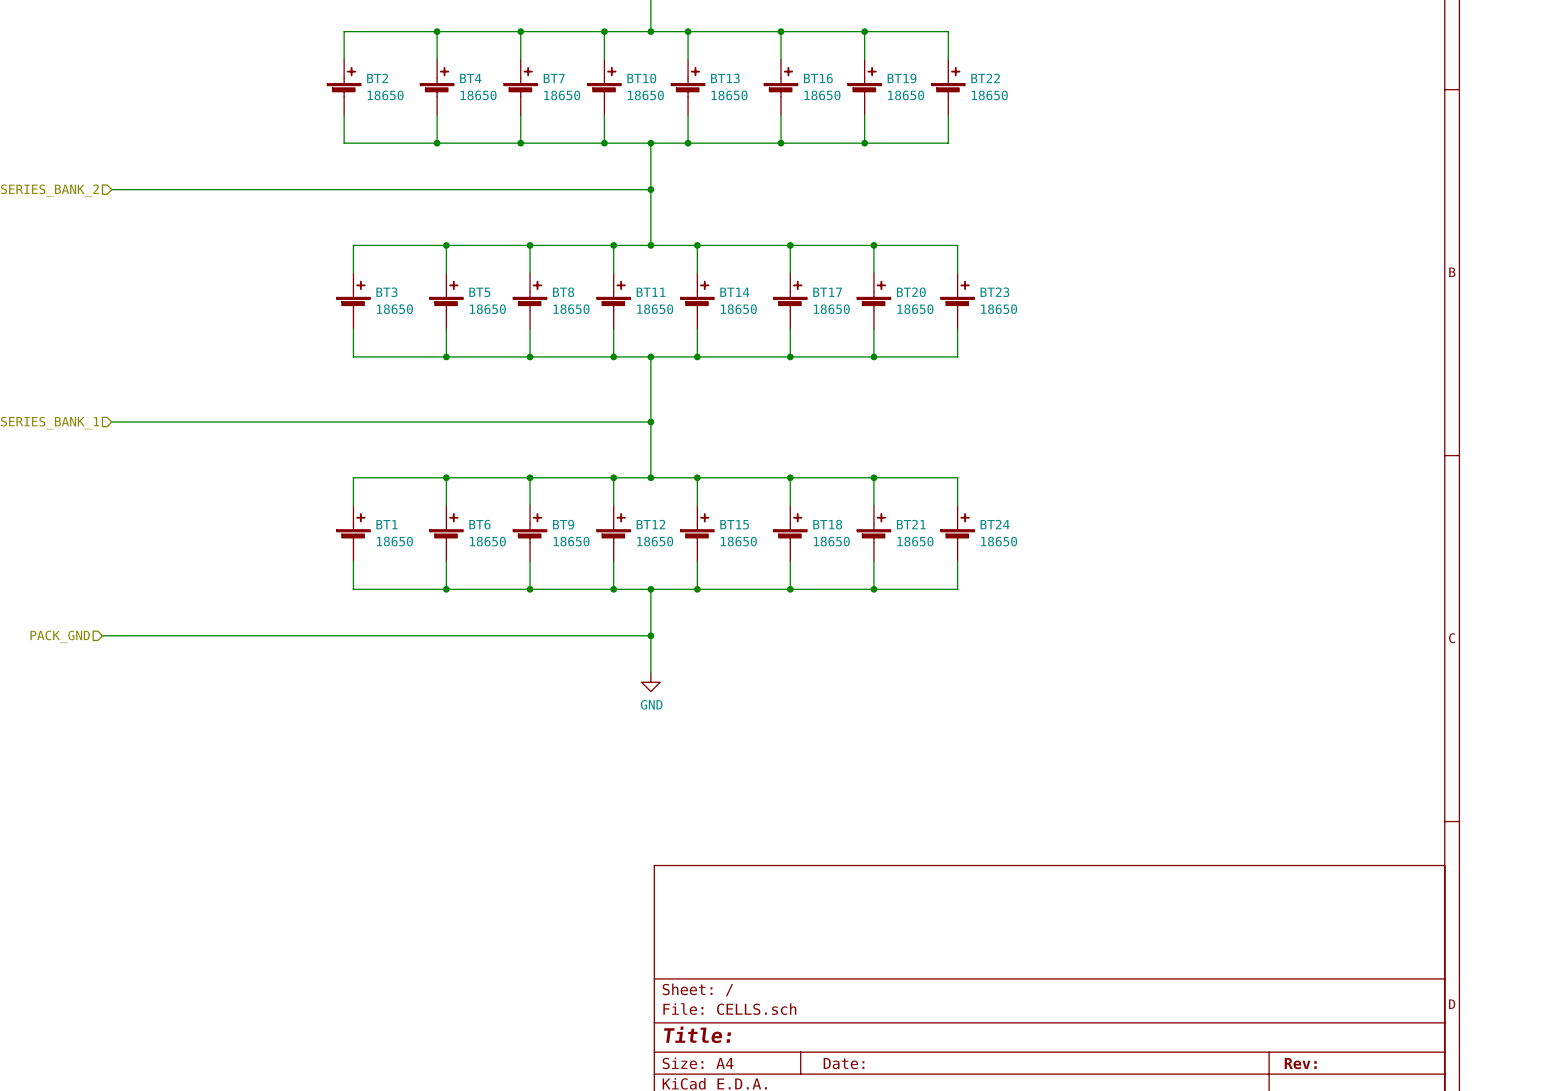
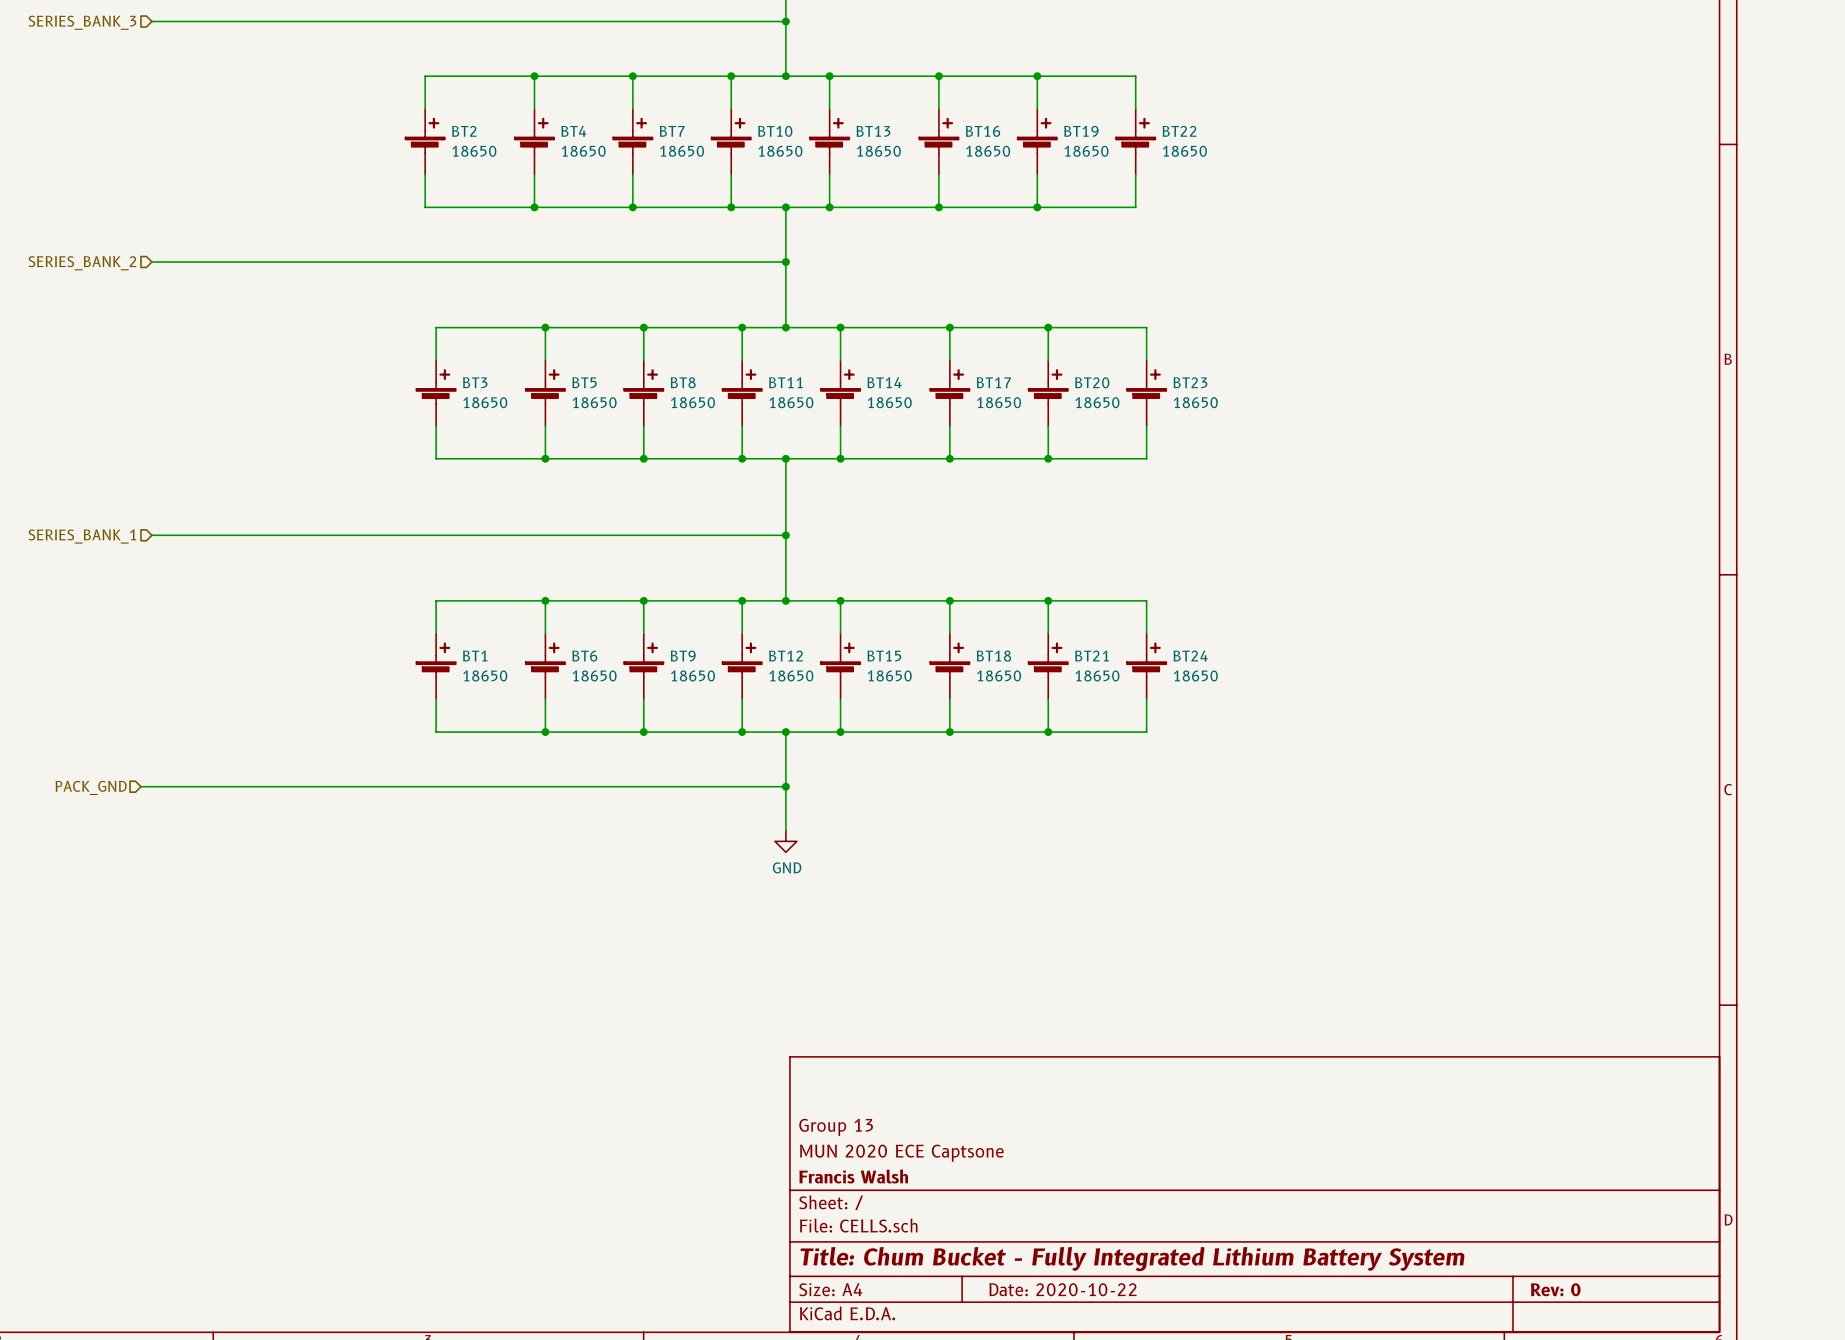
title block: none -> Group 13 (836, 1127)
title block: none -> MUN 2020 ECE Captsone (901, 1153)
title block: none -> Francis Walsh (853, 1176)
title block: Title: (697, 1034) -> Title: Chum Bucket - Fully Integrated Lithium Battery System (1132, 1259)
title block: Date: (844, 1063) -> Date: 2020-10-22 (1062, 1289)
title block: Rev: (1300, 1063) -> Rev: 0 (1555, 1289)

